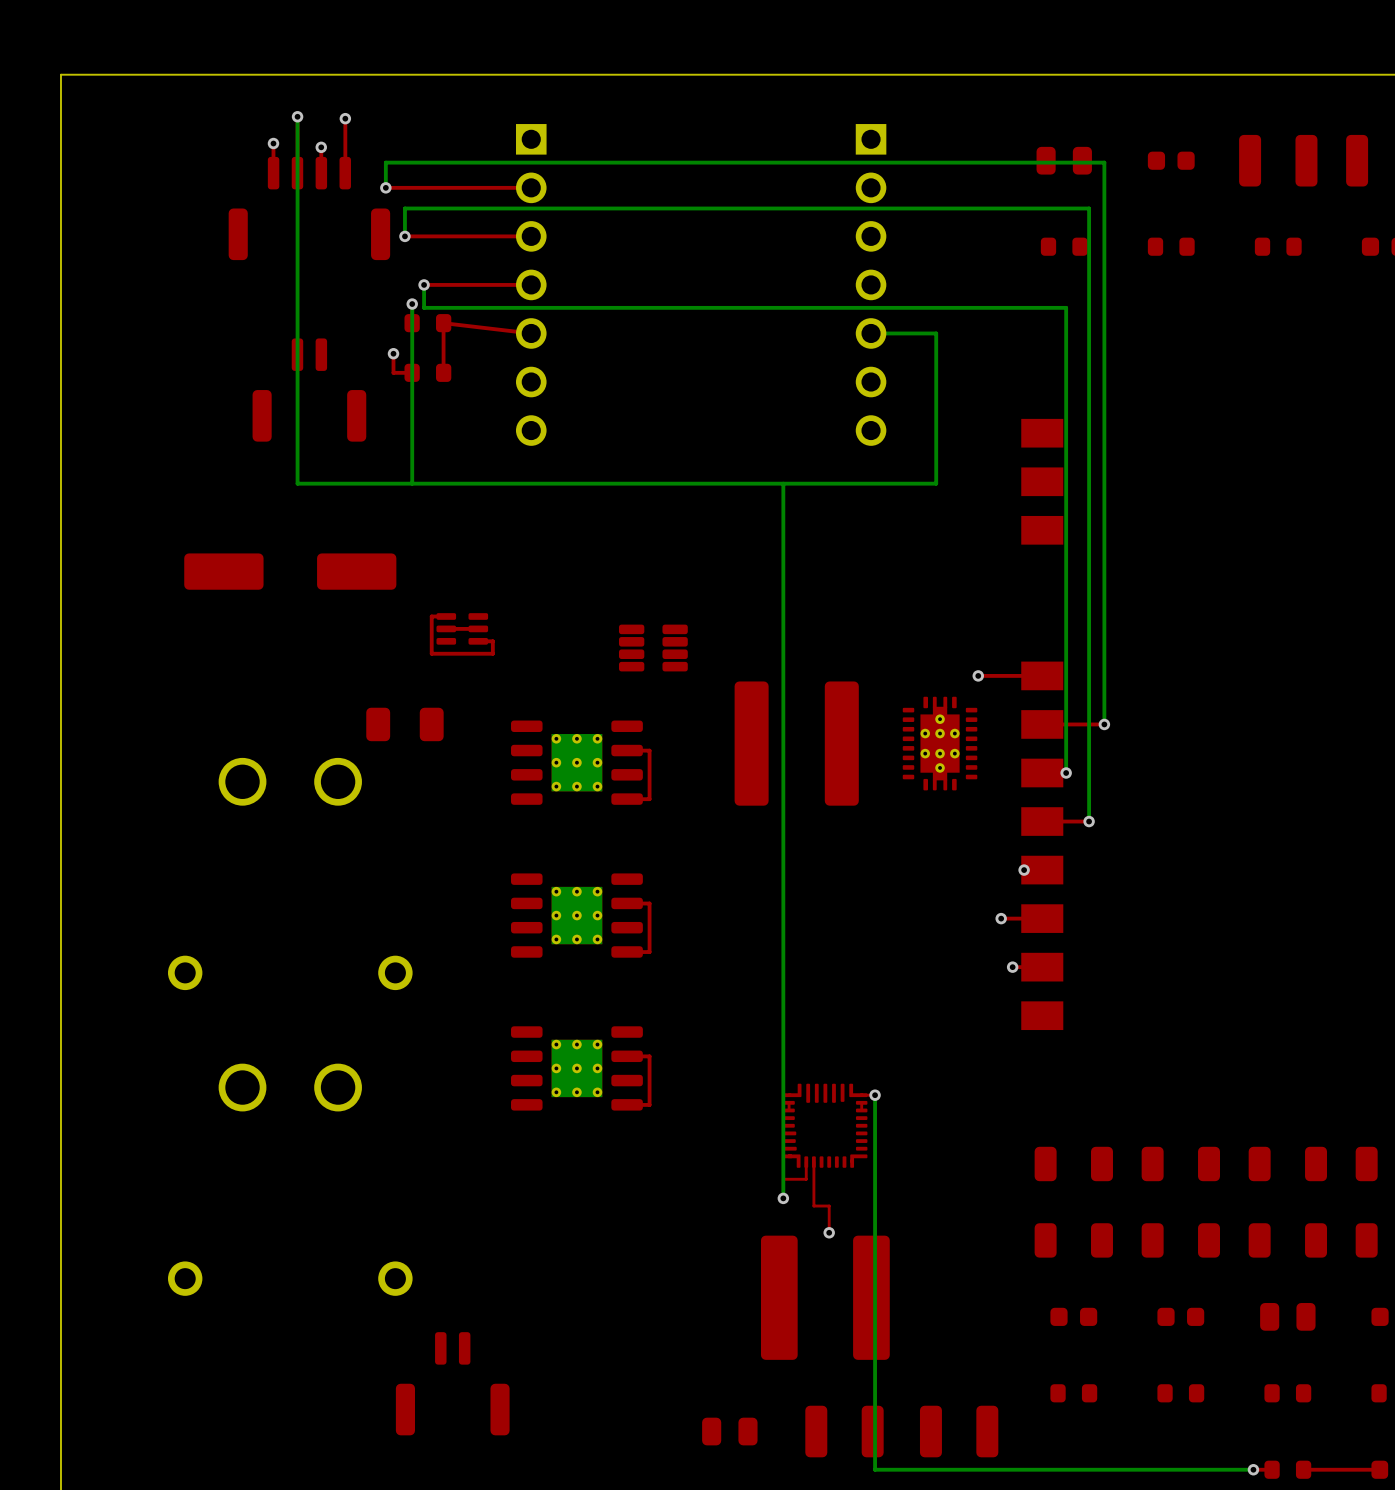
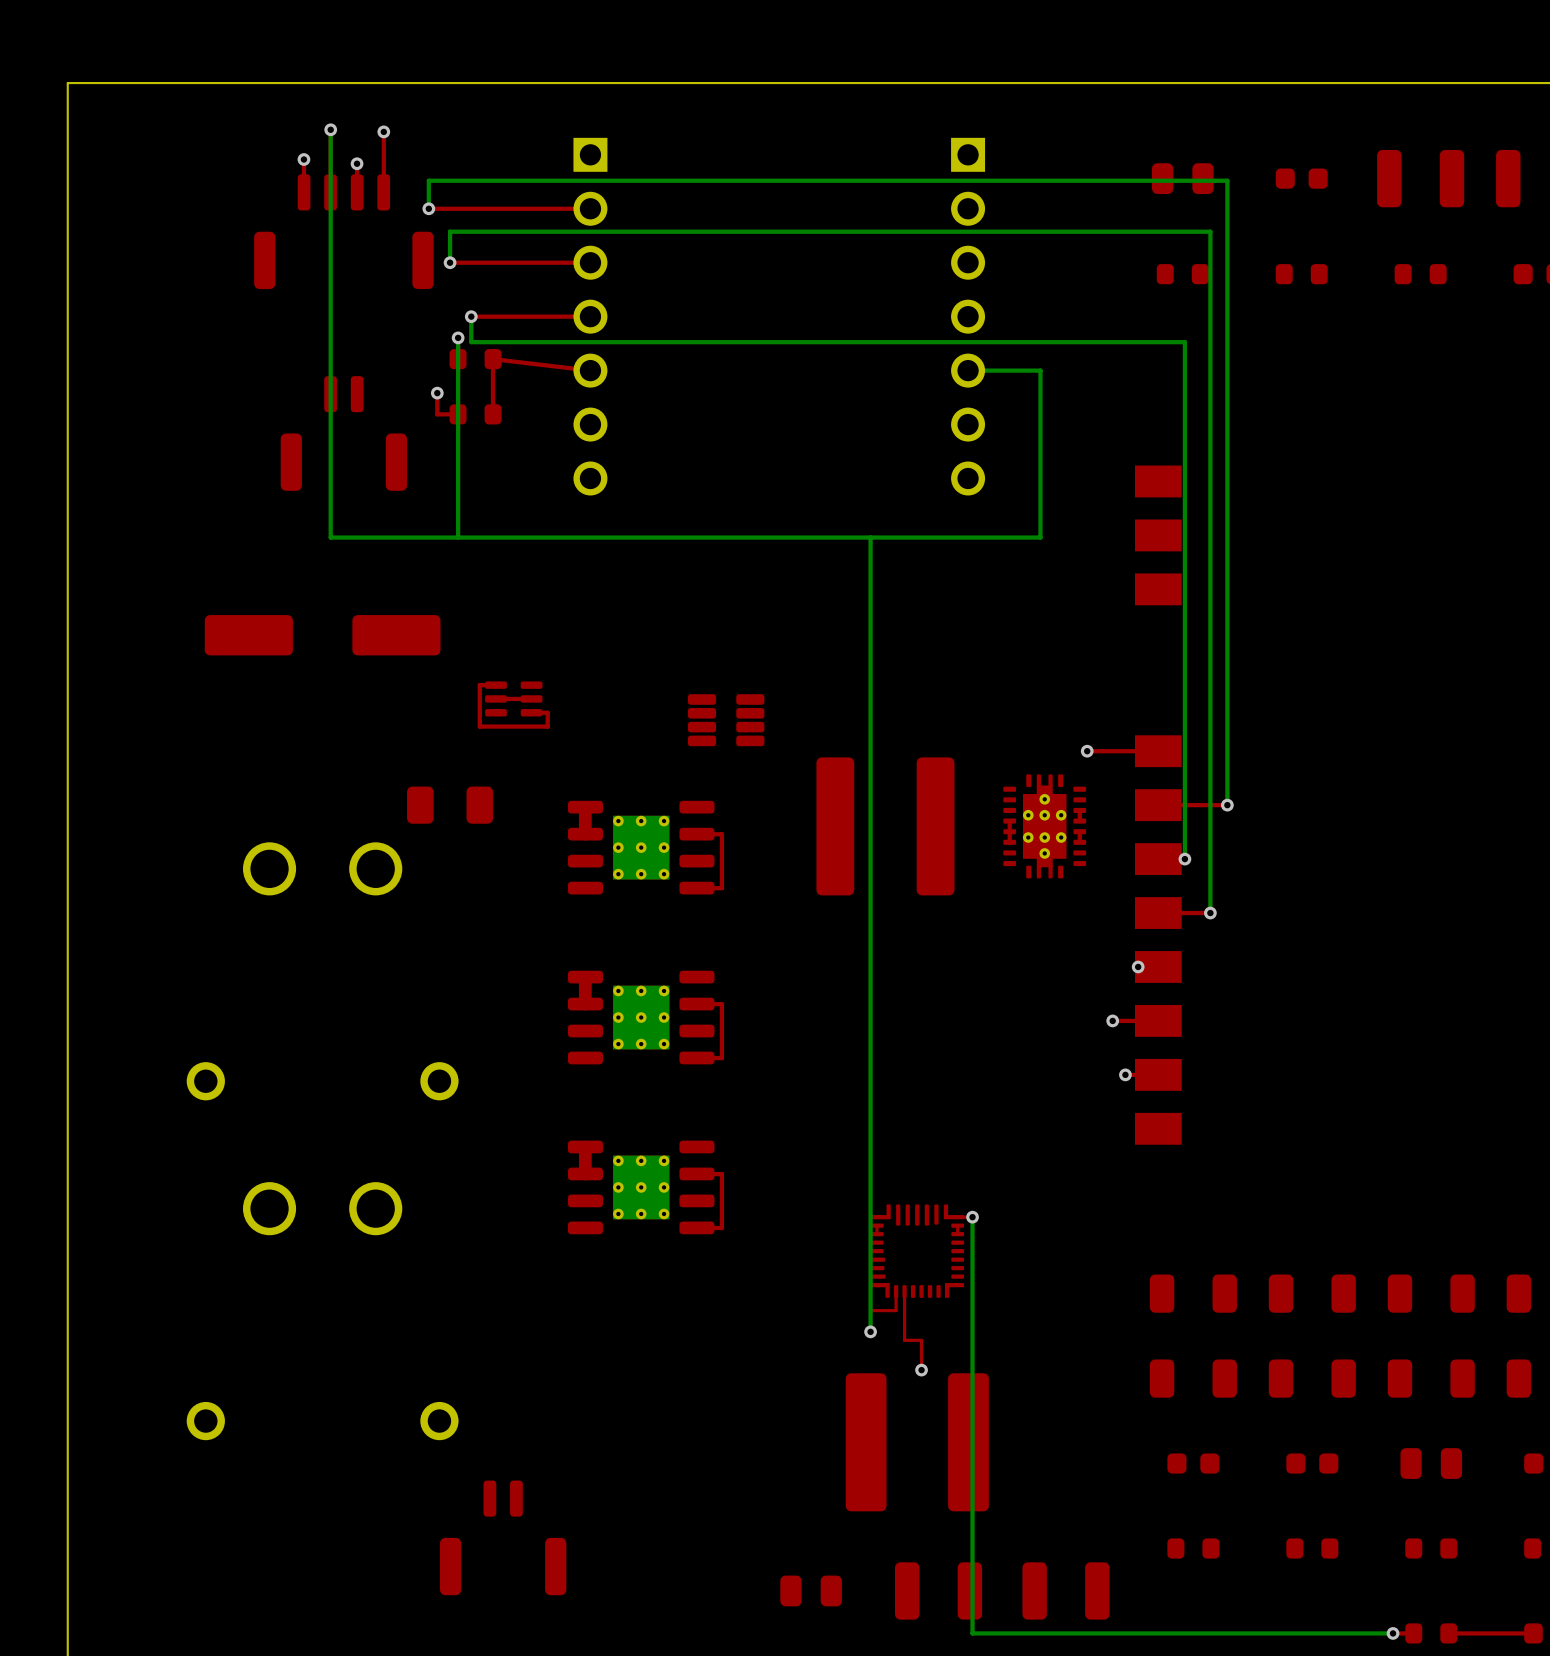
top track: none -> (585, 807) (585, 834)
top track: none -> (1079, 810) (1079, 821)
top track: none -> (1009, 821) (1009, 842)
top track: none -> (1079, 831) (1079, 842)
top track: none -> (585, 977) (585, 1004)
top track: none -> (585, 1147) (585, 1174)

